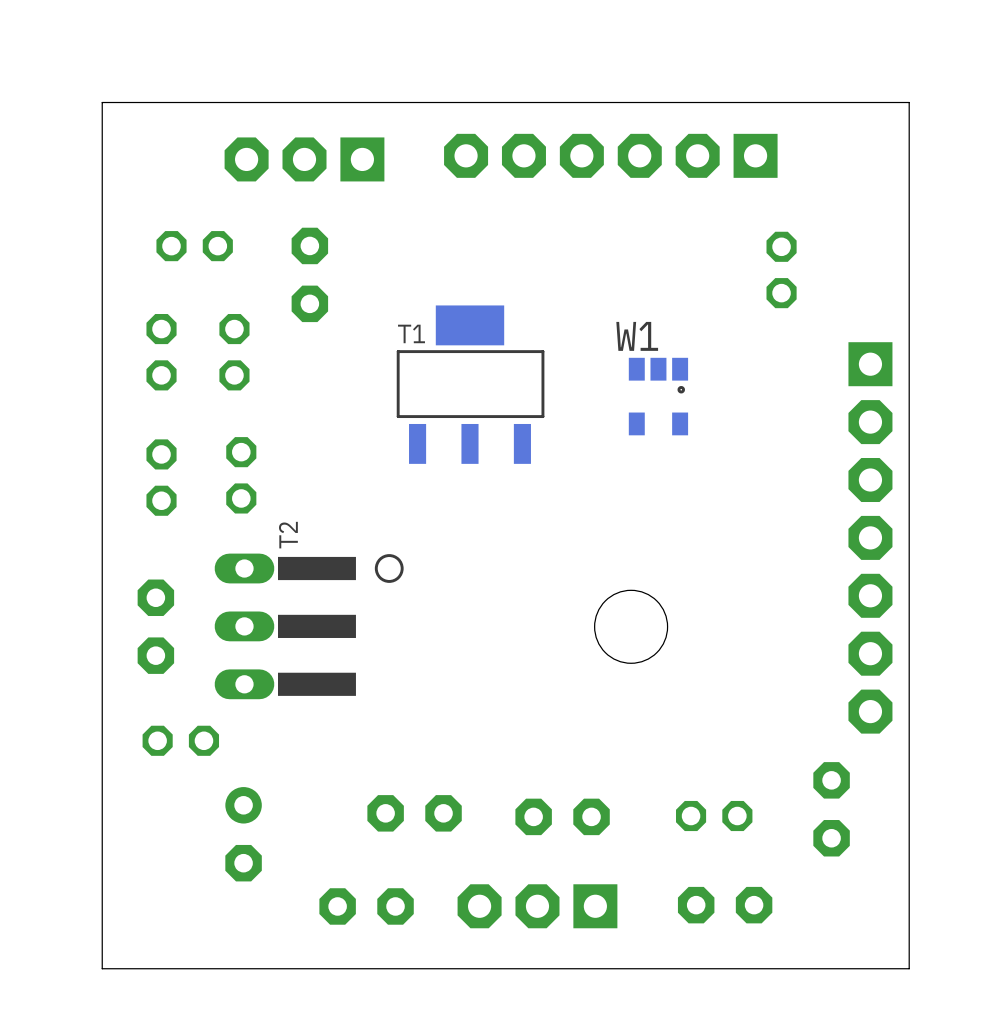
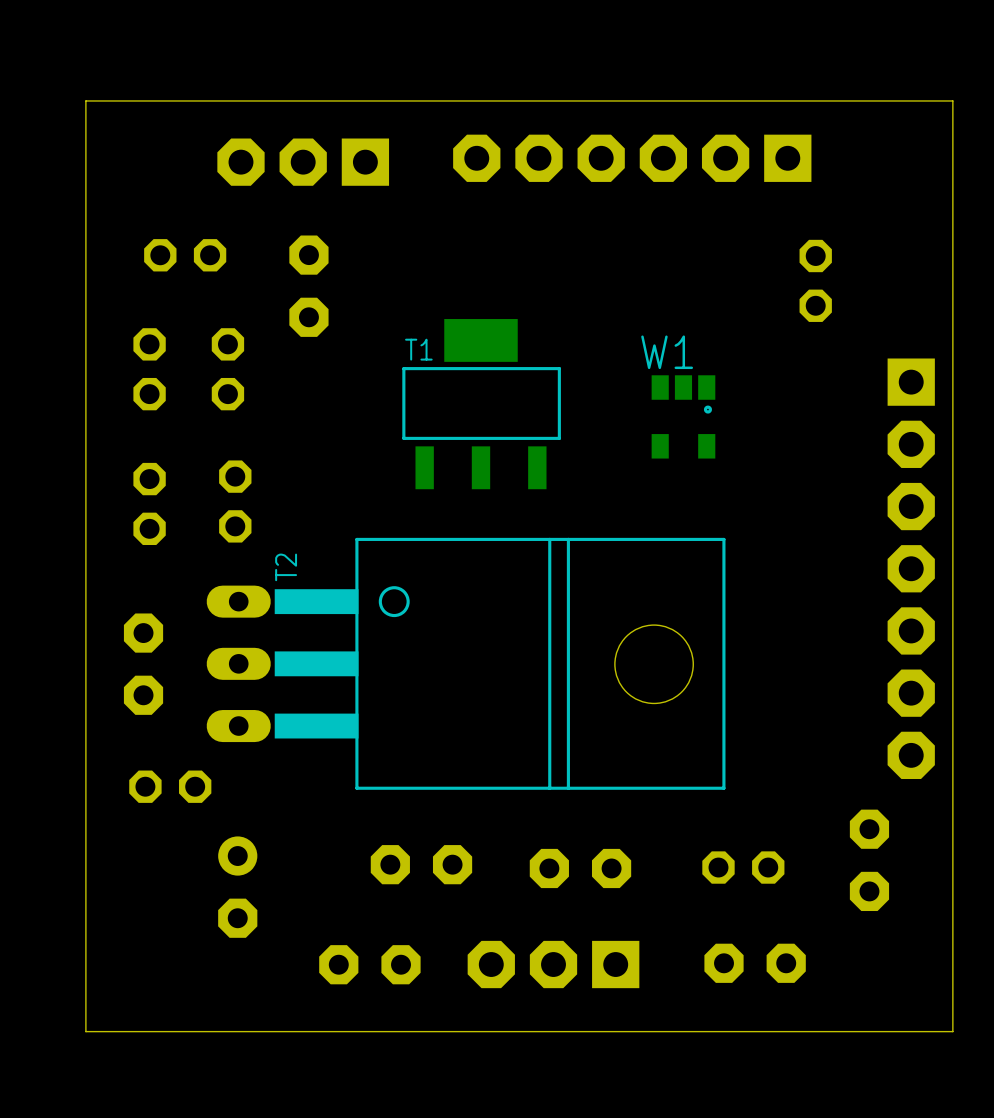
T2 footprint: [214, 553, 404, 700] -> [206, 537, 726, 790]

